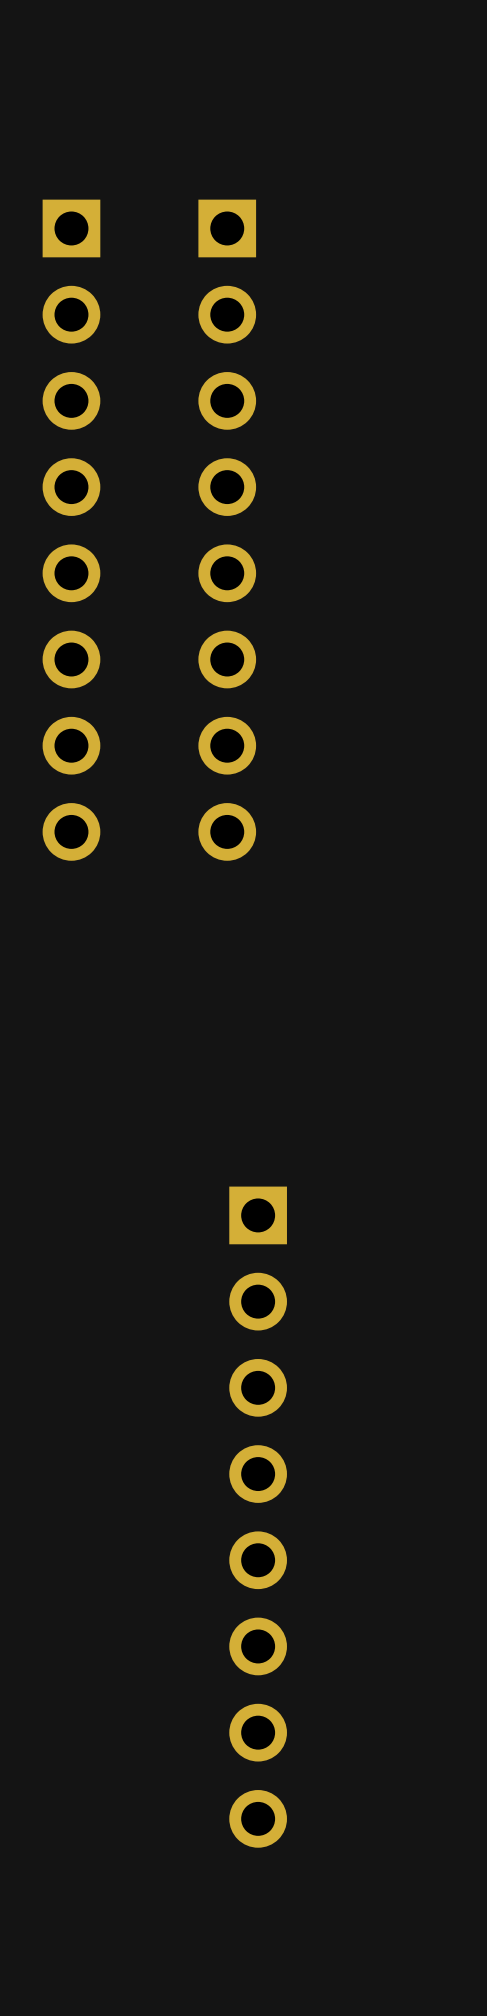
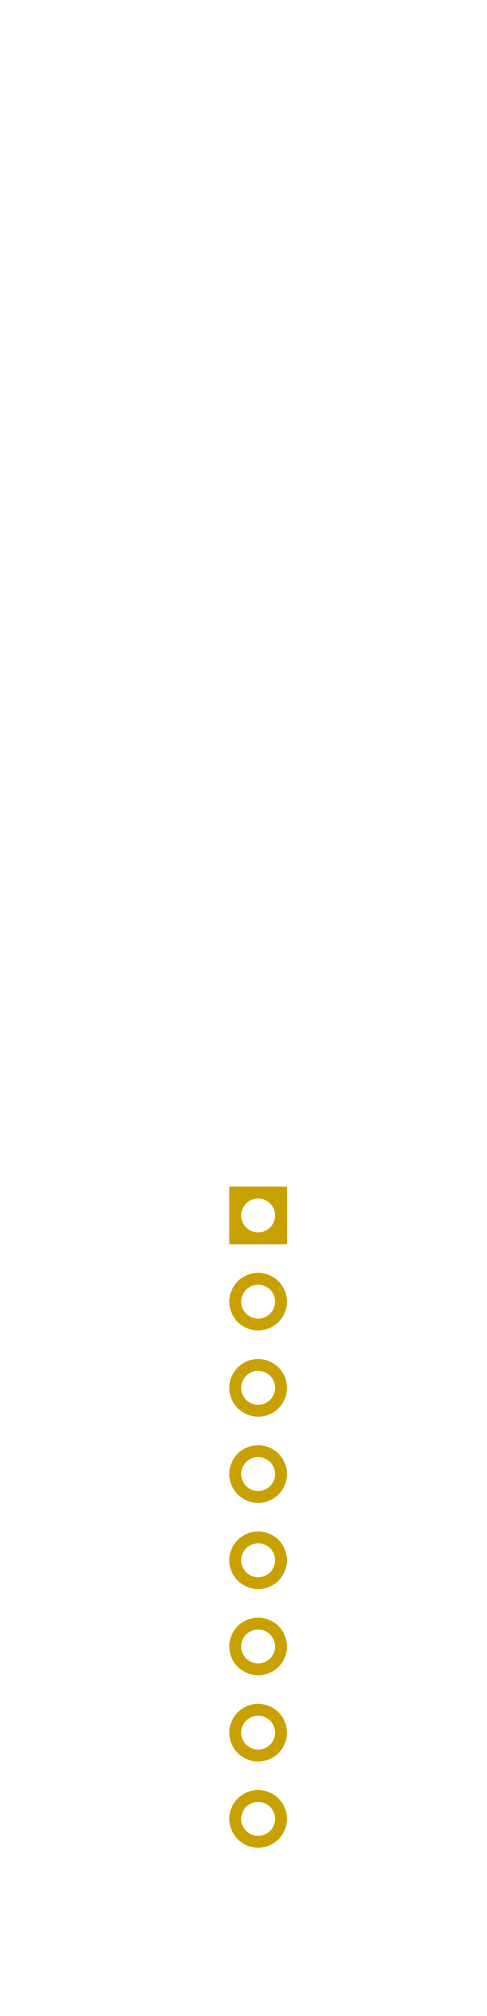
part: (71, 530) -> none
part: (227, 530) -> none

